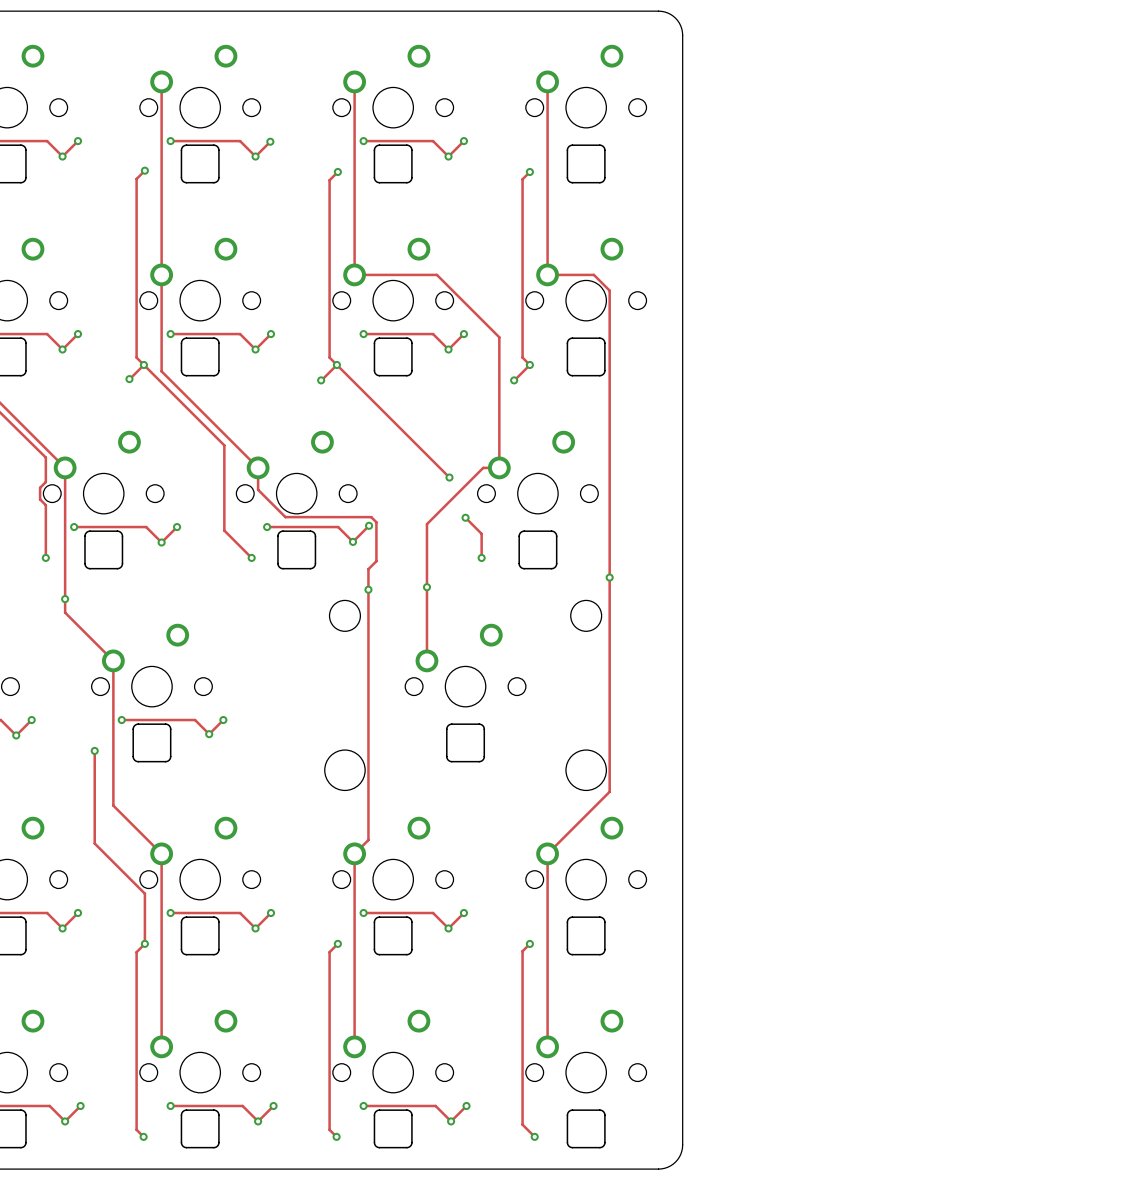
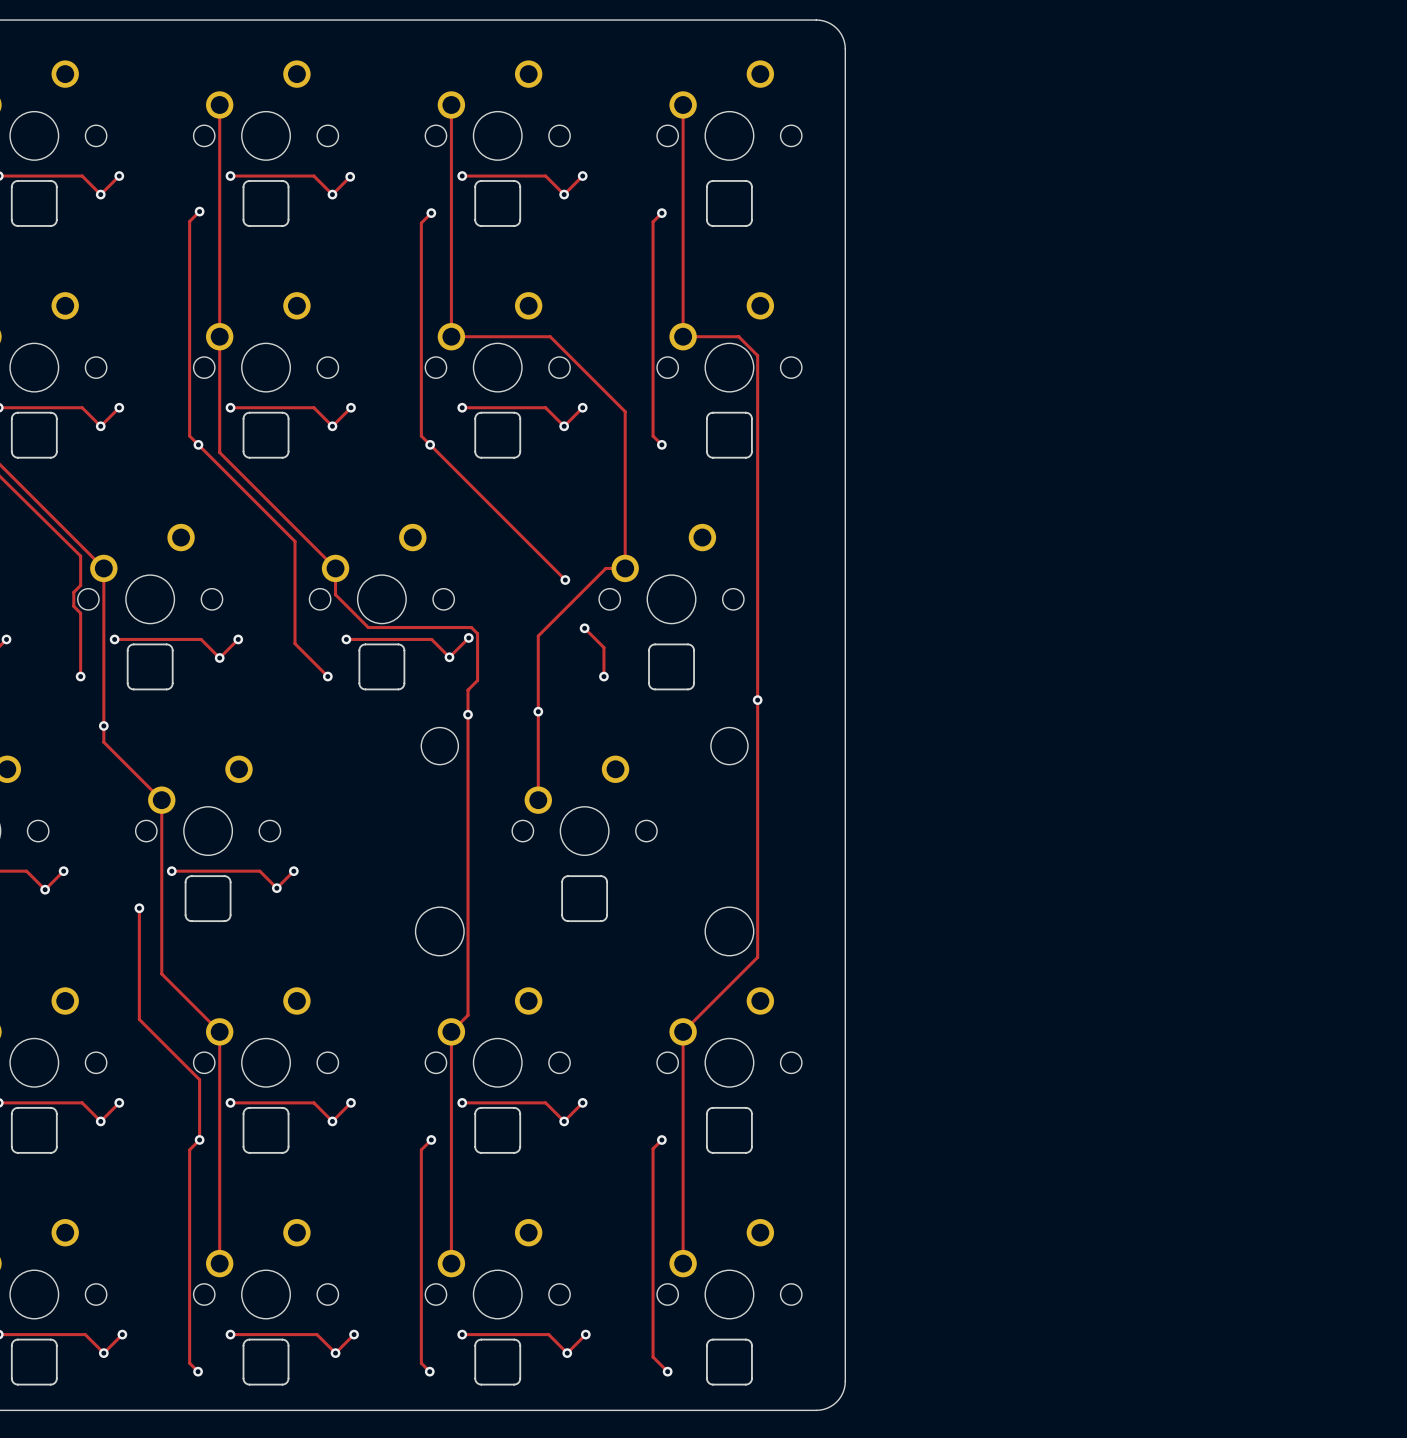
track: (143, 364) (129, 379) -> none
track: (336, 364) (321, 380) -> none
track: (529, 364) (514, 380) -> none
via: (129, 379) -> none
via: (321, 380) -> none
via: (514, 380) -> none

